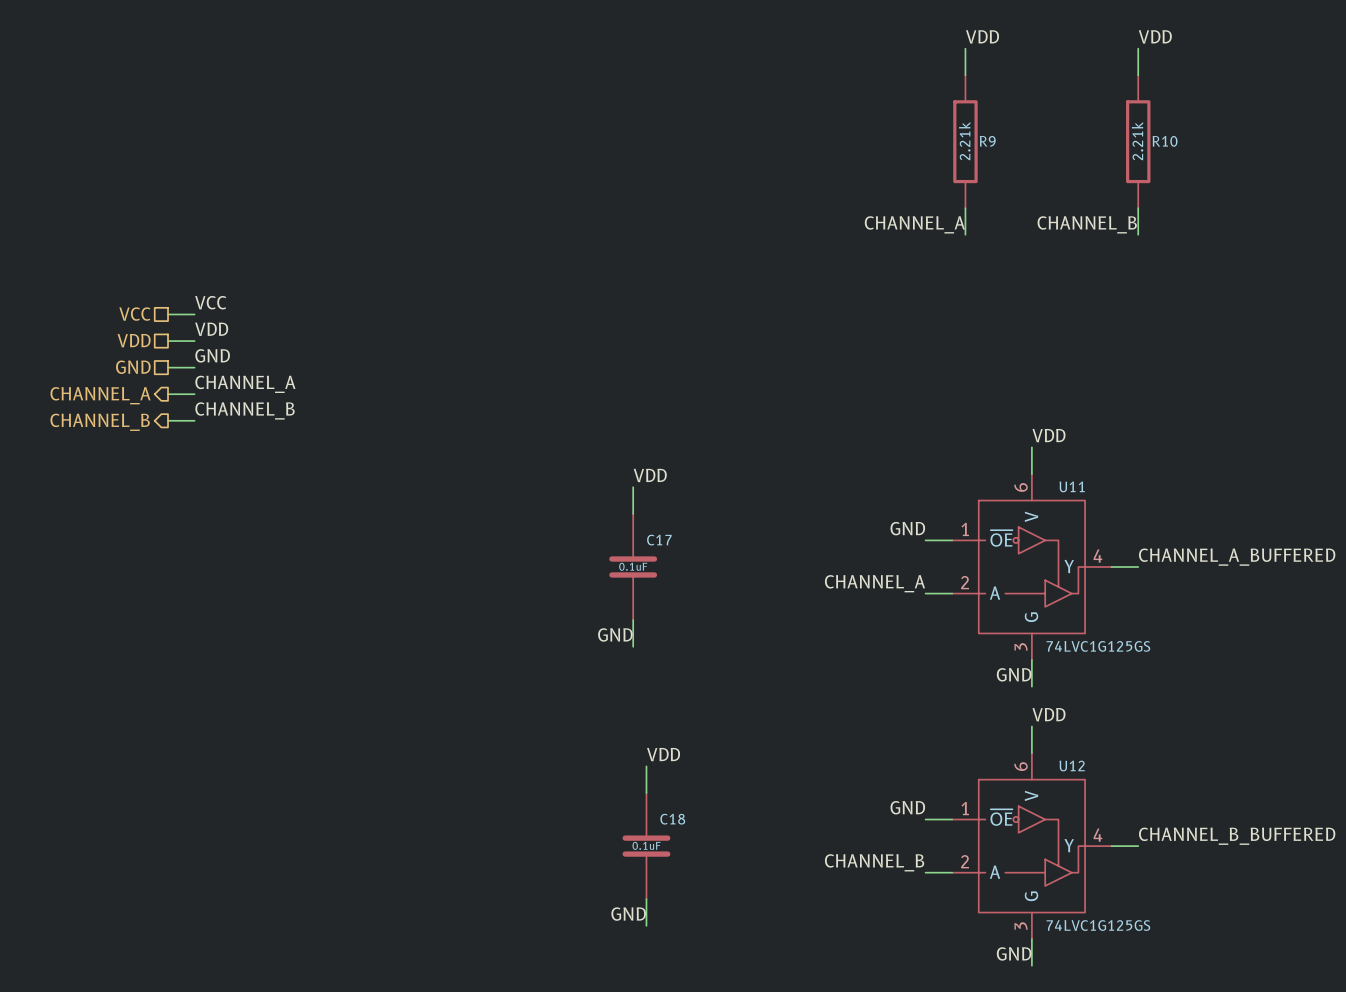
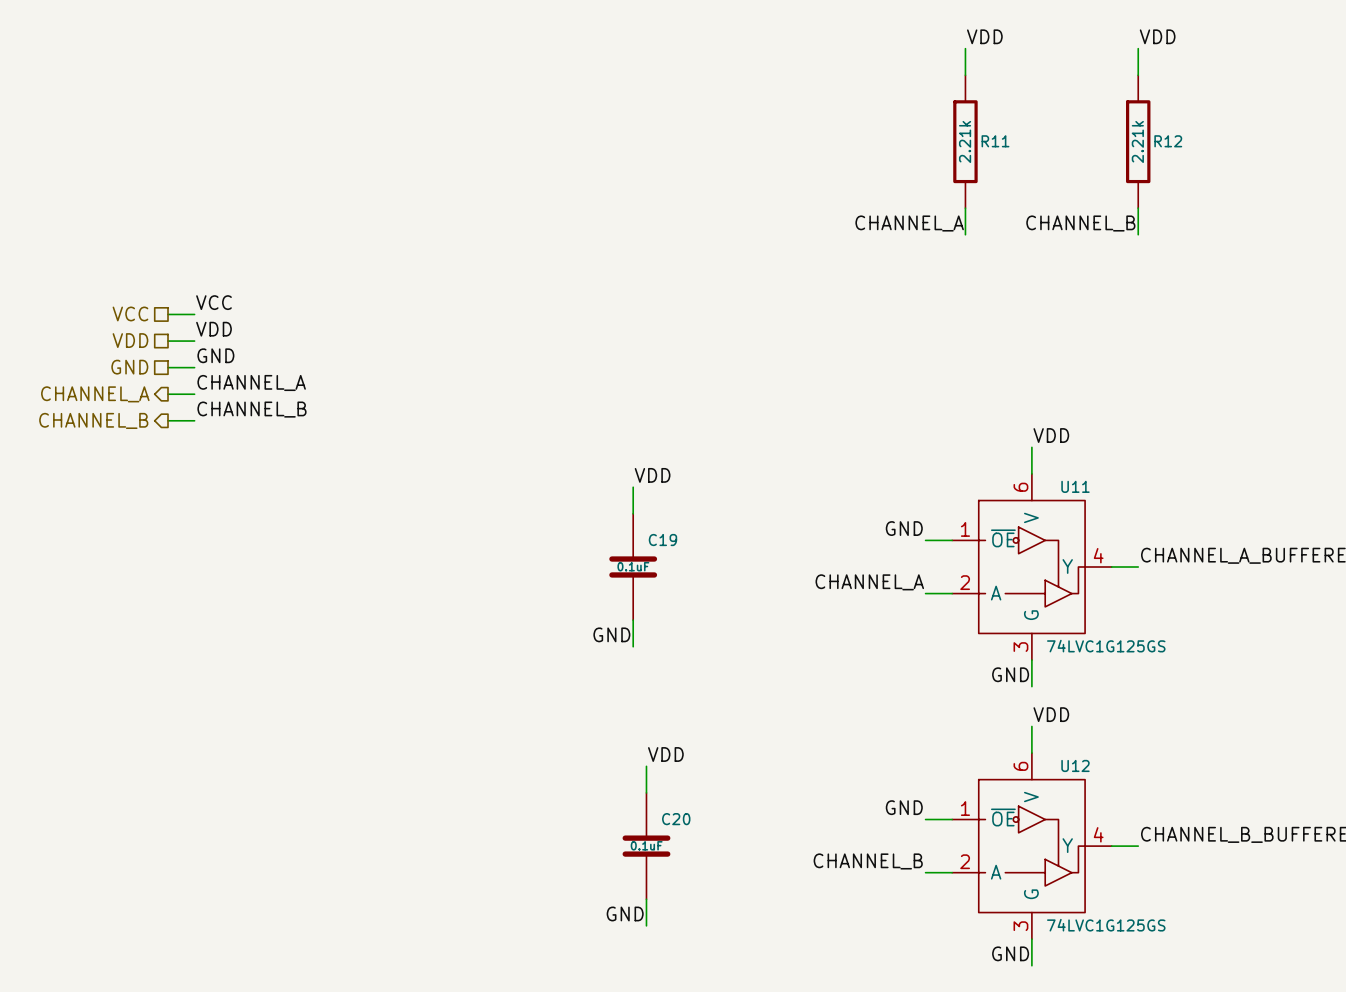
R9 name: R9 (987, 141) -> R11 (995, 141)
R10 name: R10 (1165, 141) -> R12 (1168, 141)
C17 name: C17 (659, 540) -> C19 (662, 540)
C18 name: C18 (672, 819) -> C20 (676, 819)

